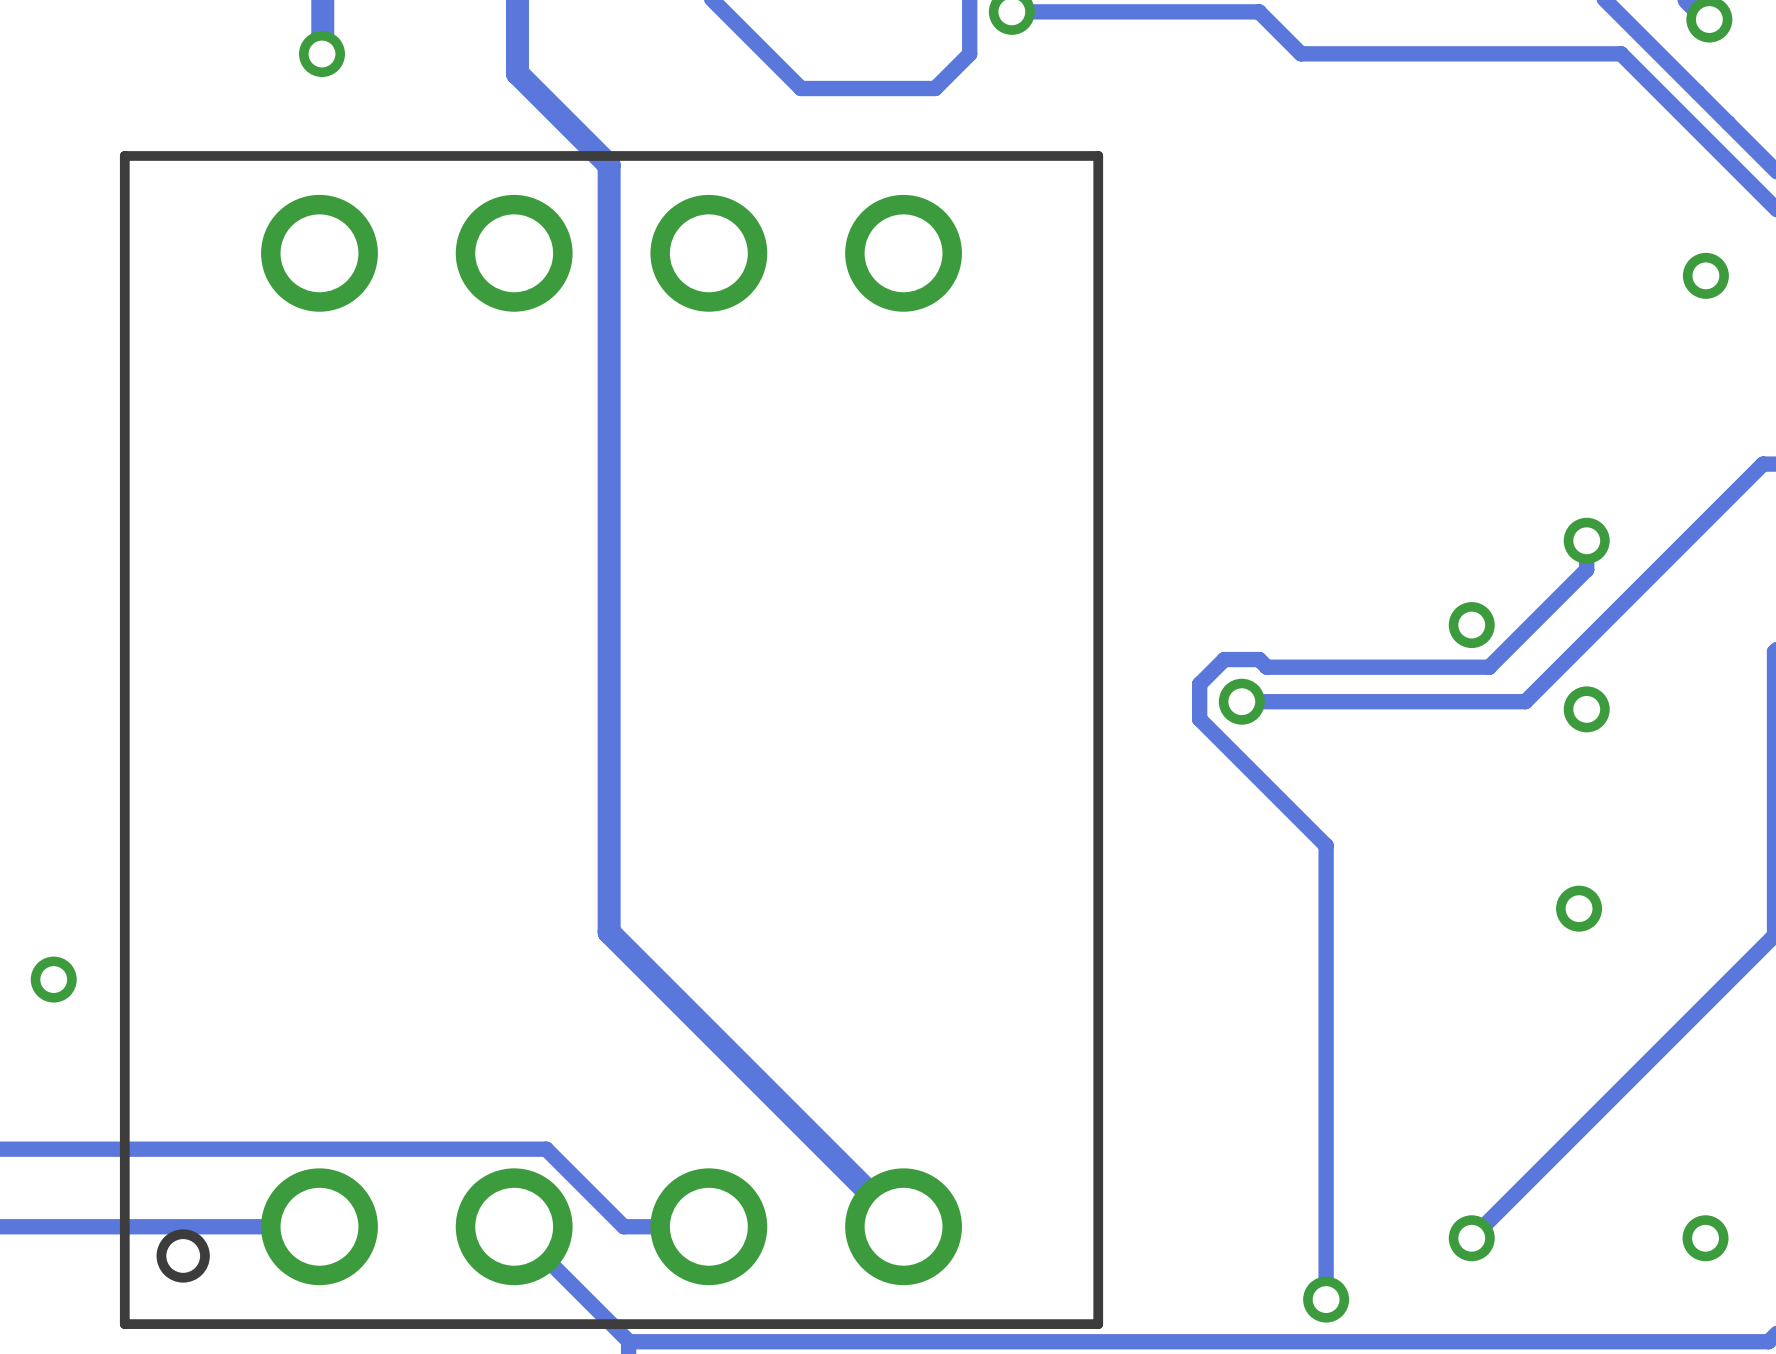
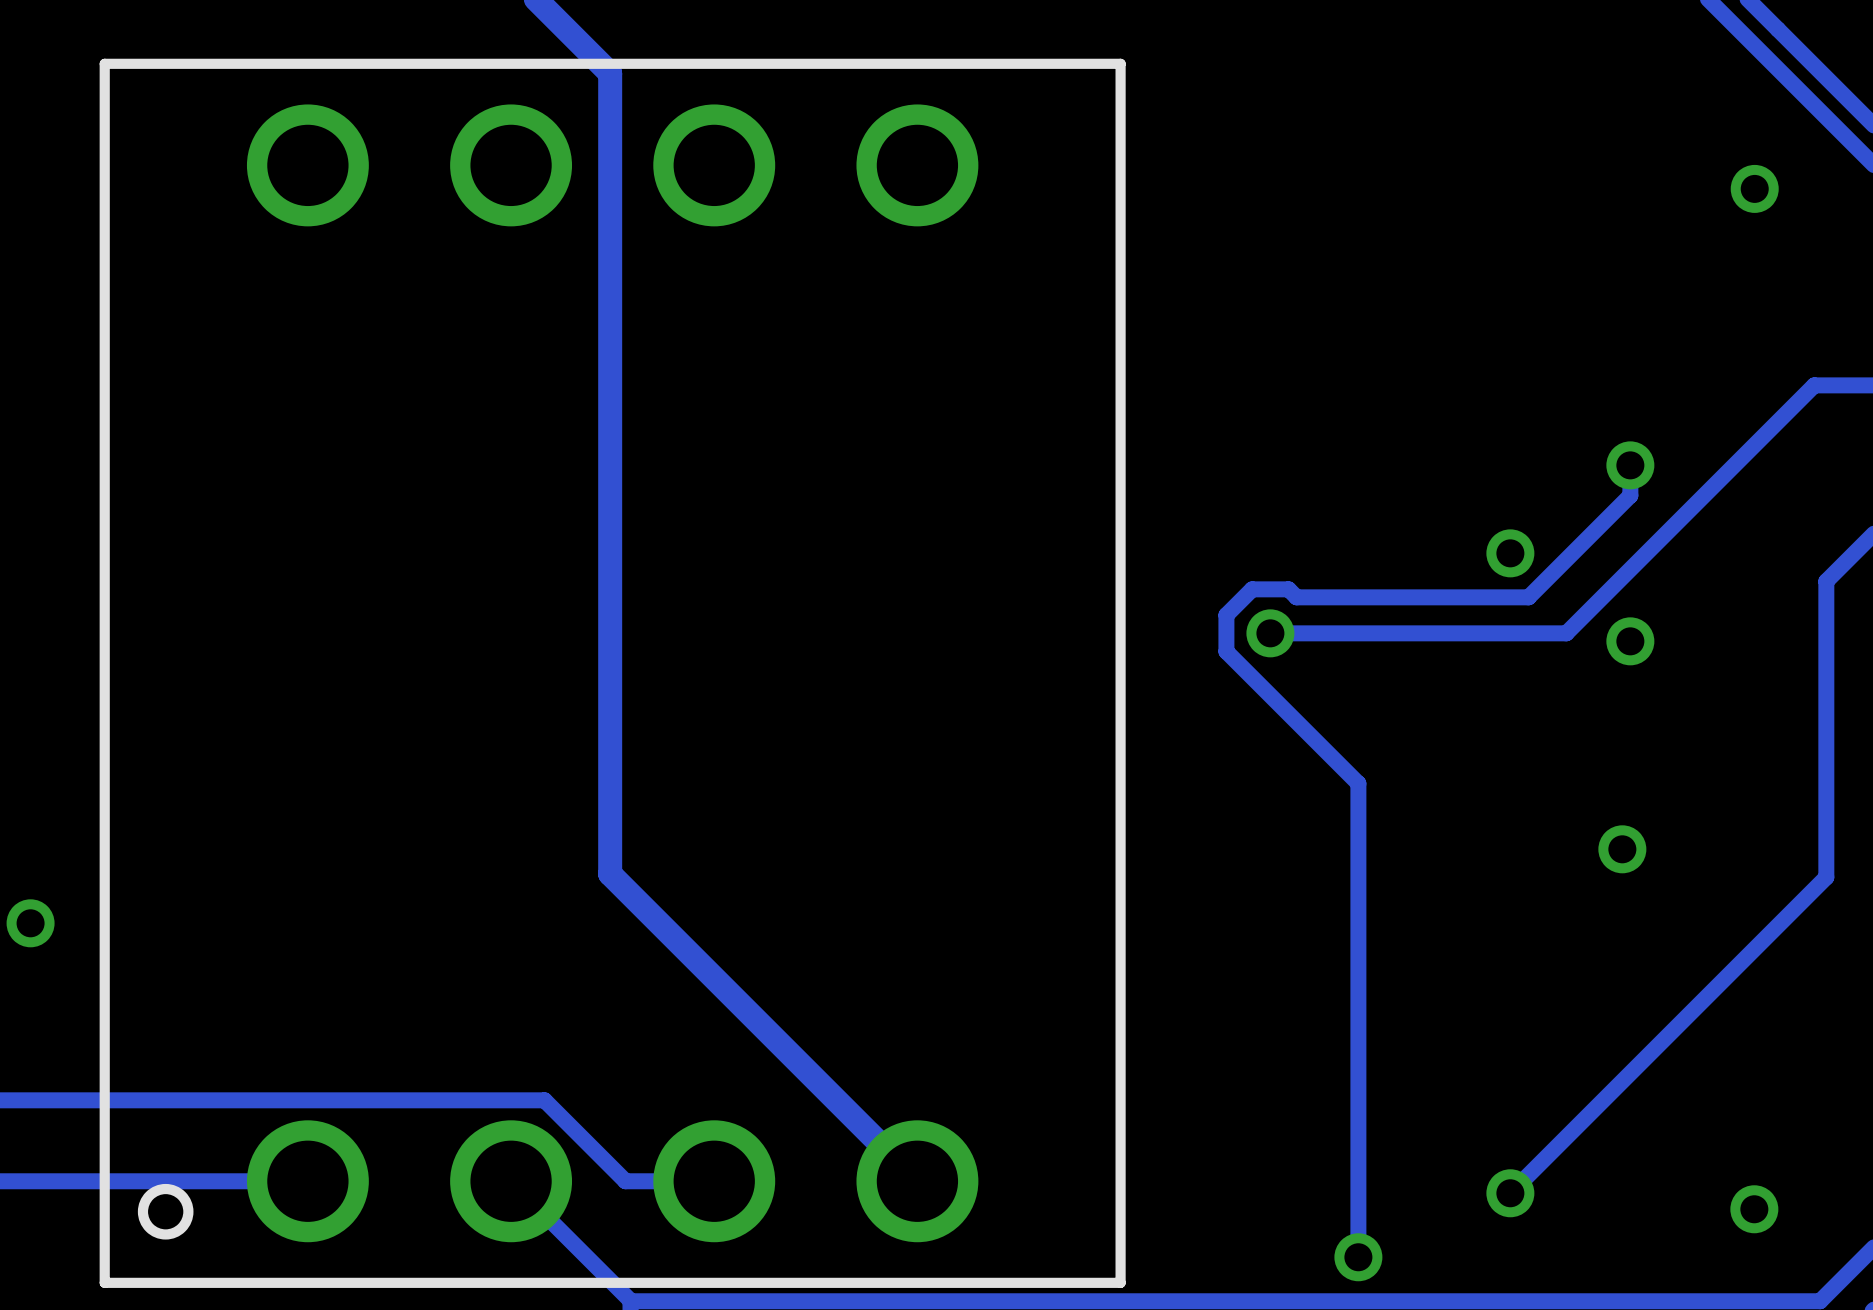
via position: (1705, 1238) -> (1754, 1209)

